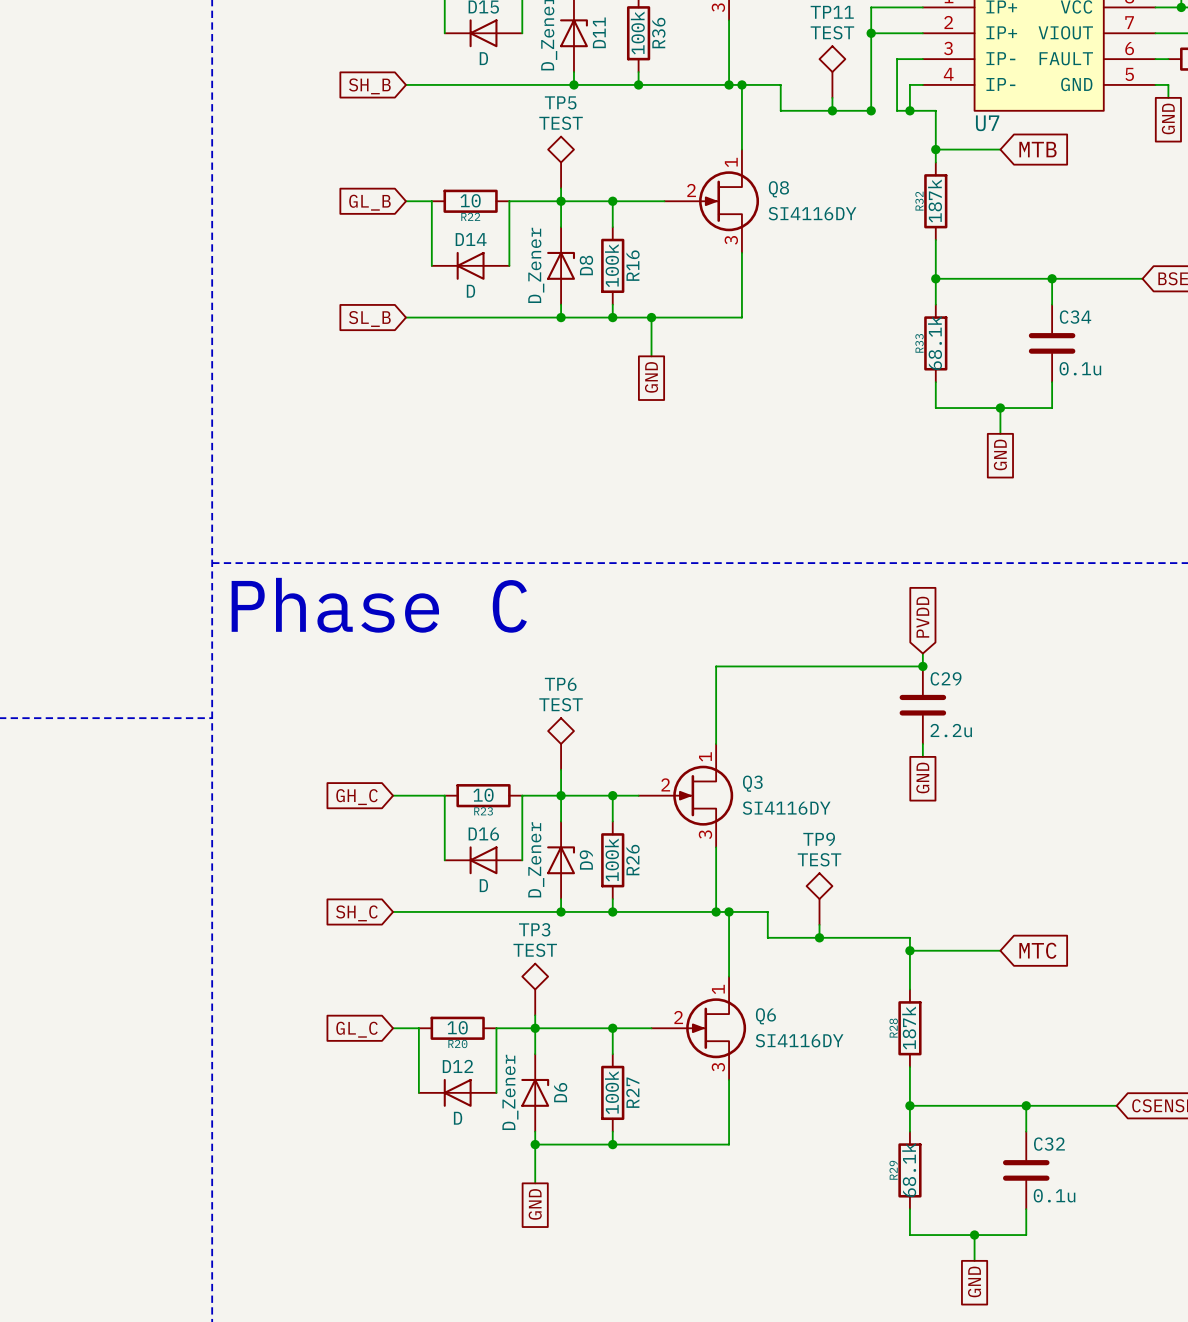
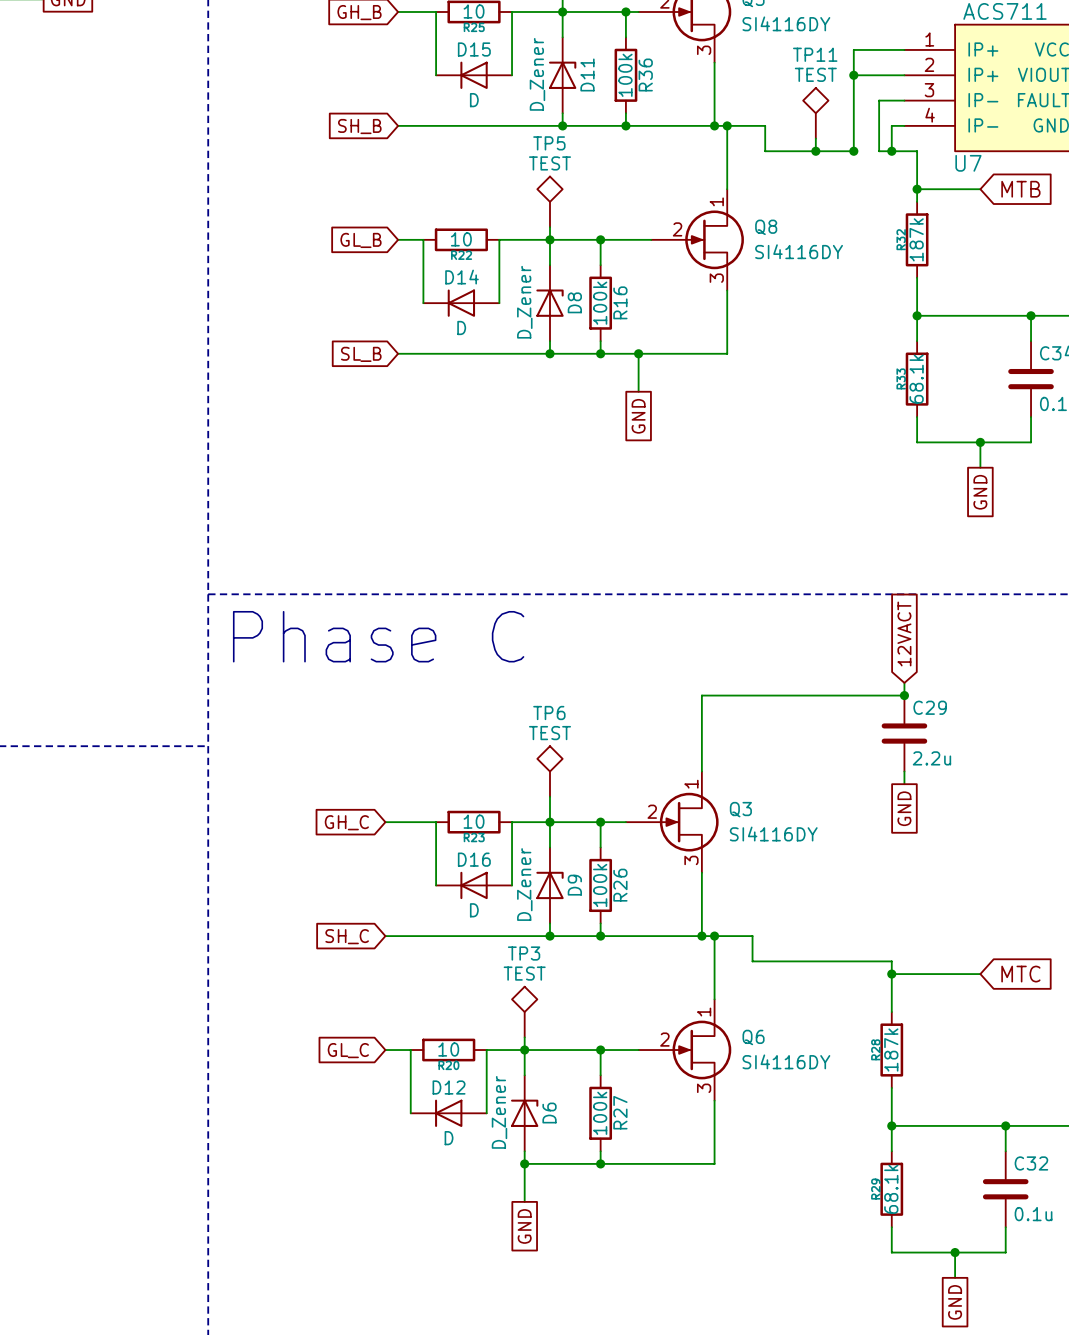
global label: PVDD (922, 617) -> 12VACT (904, 633)
TP9: TEST (819, 899) -> none
wire: (819, 924) (819, 937) -> none
junction: (819, 937) -> none

